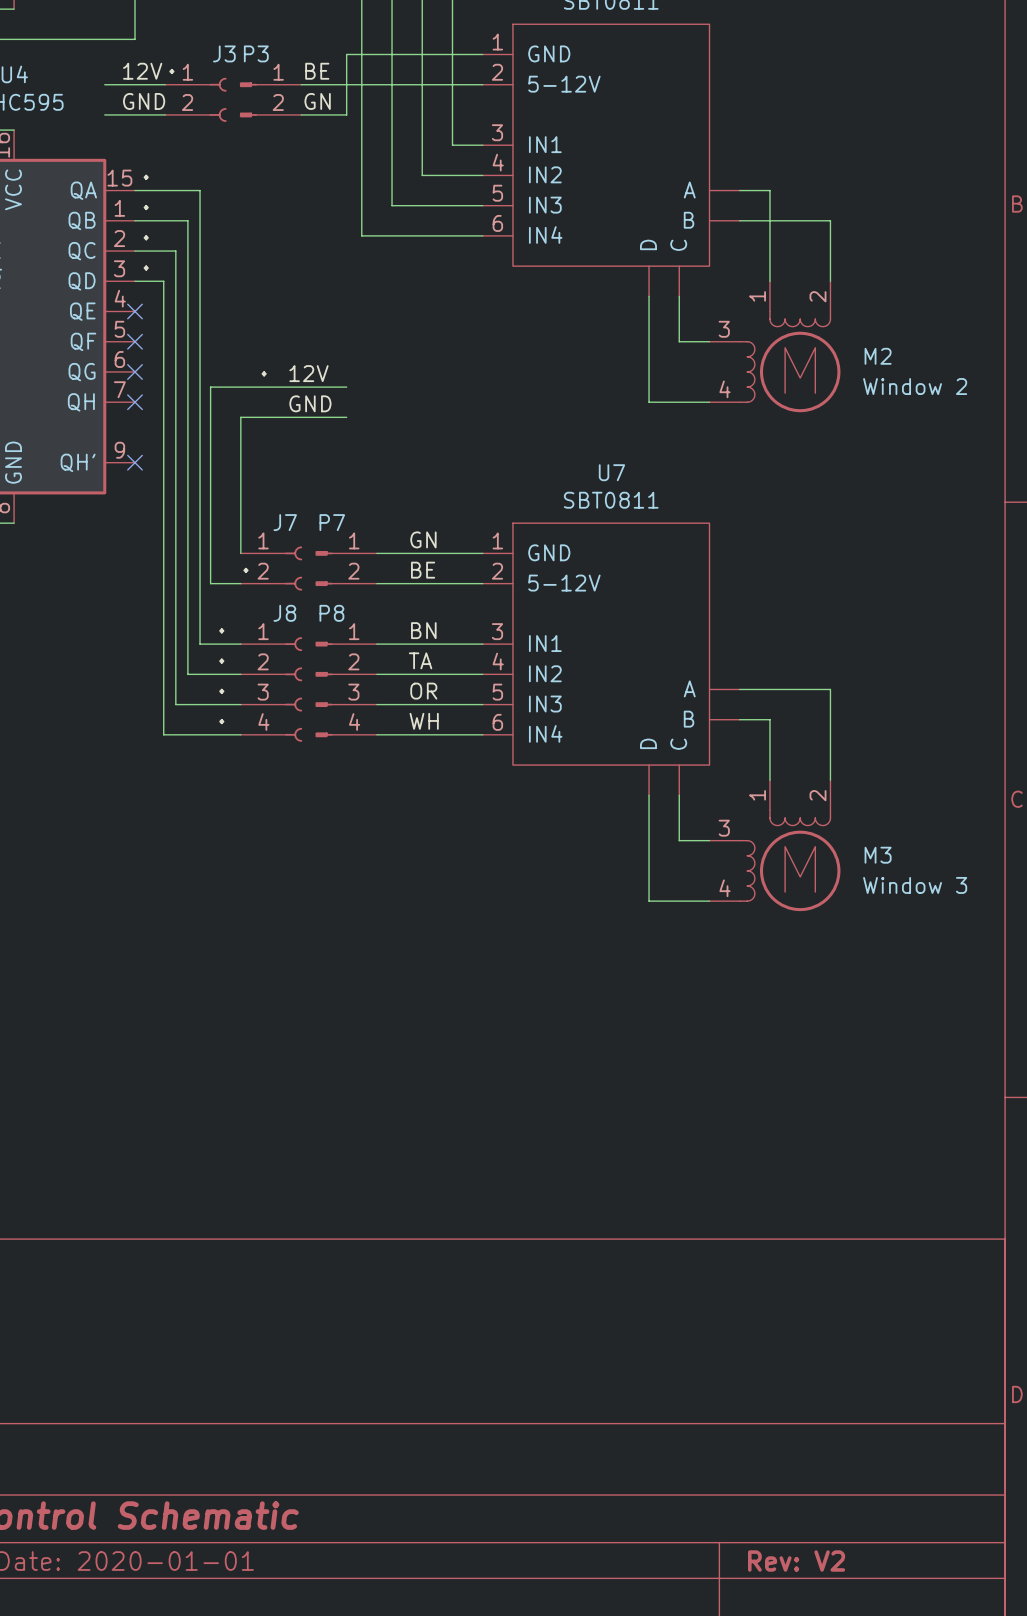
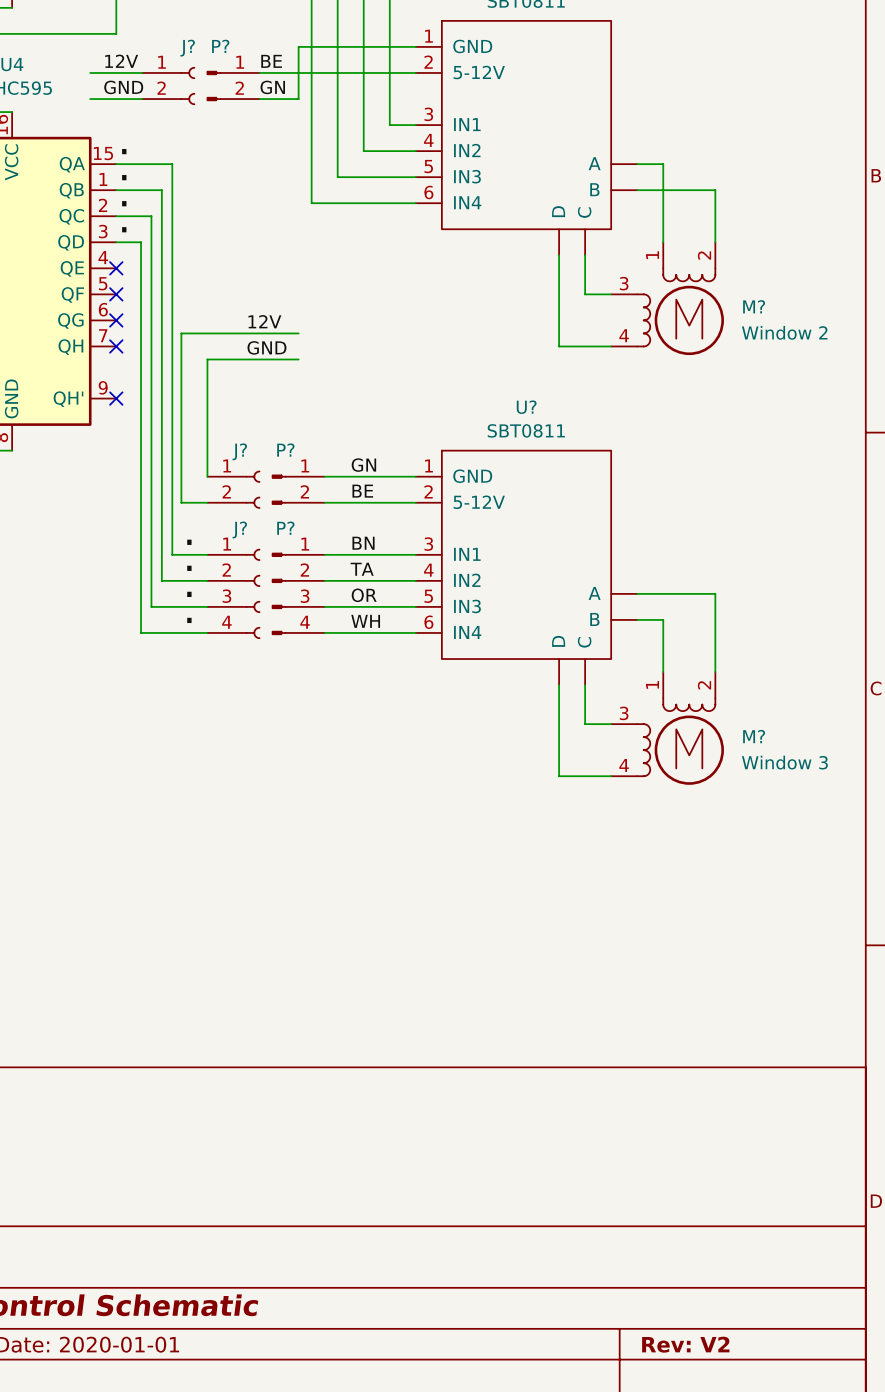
J3 name: J3 (224, 53) -> J? (187, 48)
P3 name: P3 (256, 53) -> P? (220, 46)
label: . (171, 71) -> none
M2 name: M2 (878, 356) -> M? (754, 306)
label: . (264, 373) -> none
U7 name: U7 (611, 472) -> U? (526, 407)
J7 name: J7 (285, 522) -> J? (239, 451)
P7 name: P7 (332, 522) -> P? (285, 450)
label: . (245, 570) -> none
J8 name: J8 (284, 613) -> J? (239, 529)
P8 name: P8 (331, 613) -> P? (285, 528)
M3 name: M3 (878, 855) -> M? (754, 736)

